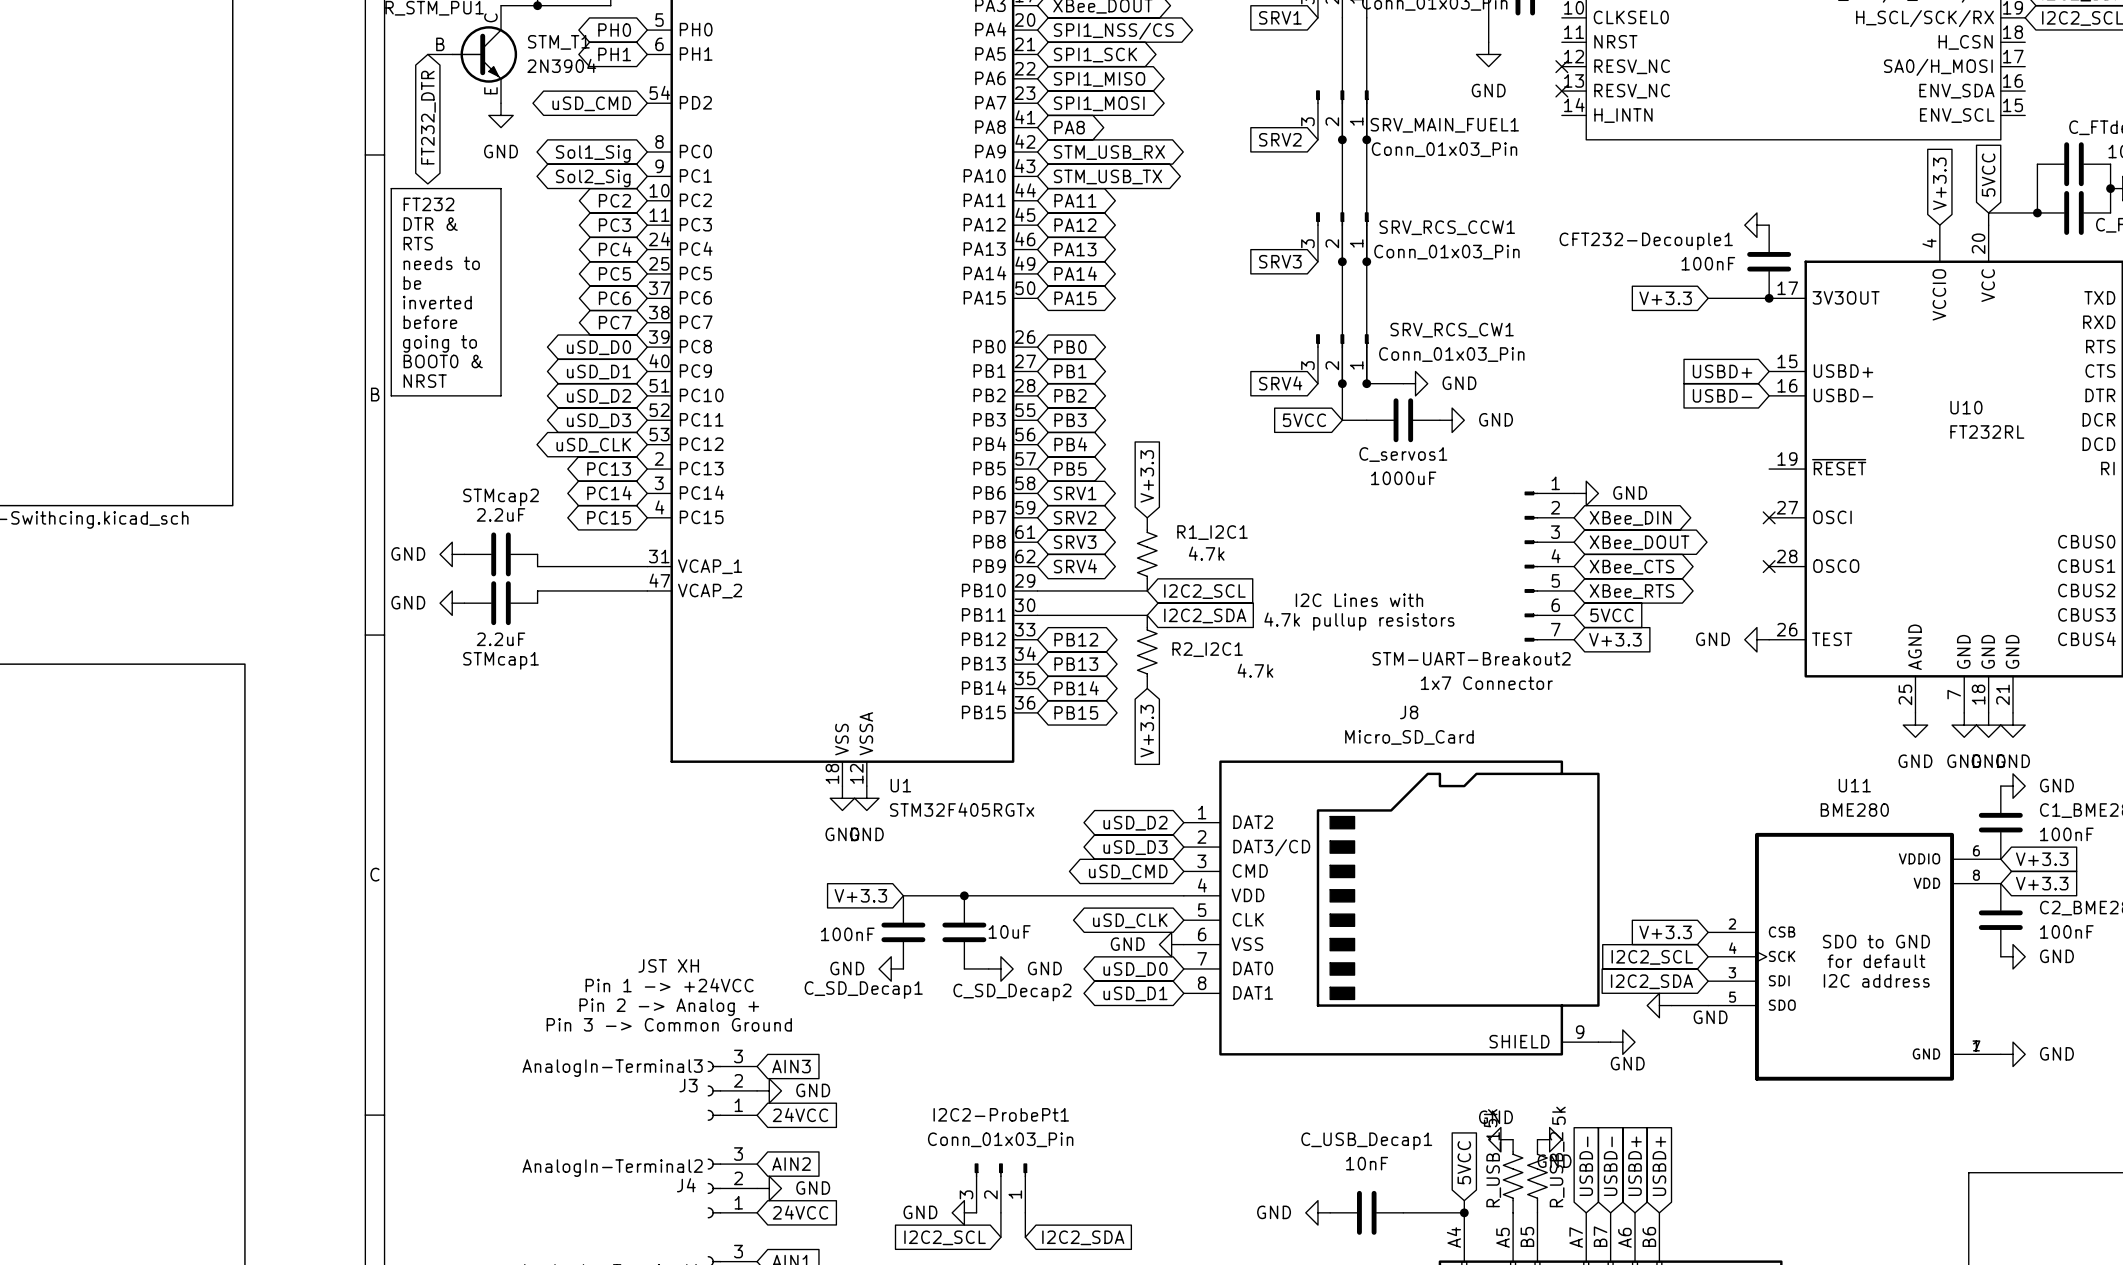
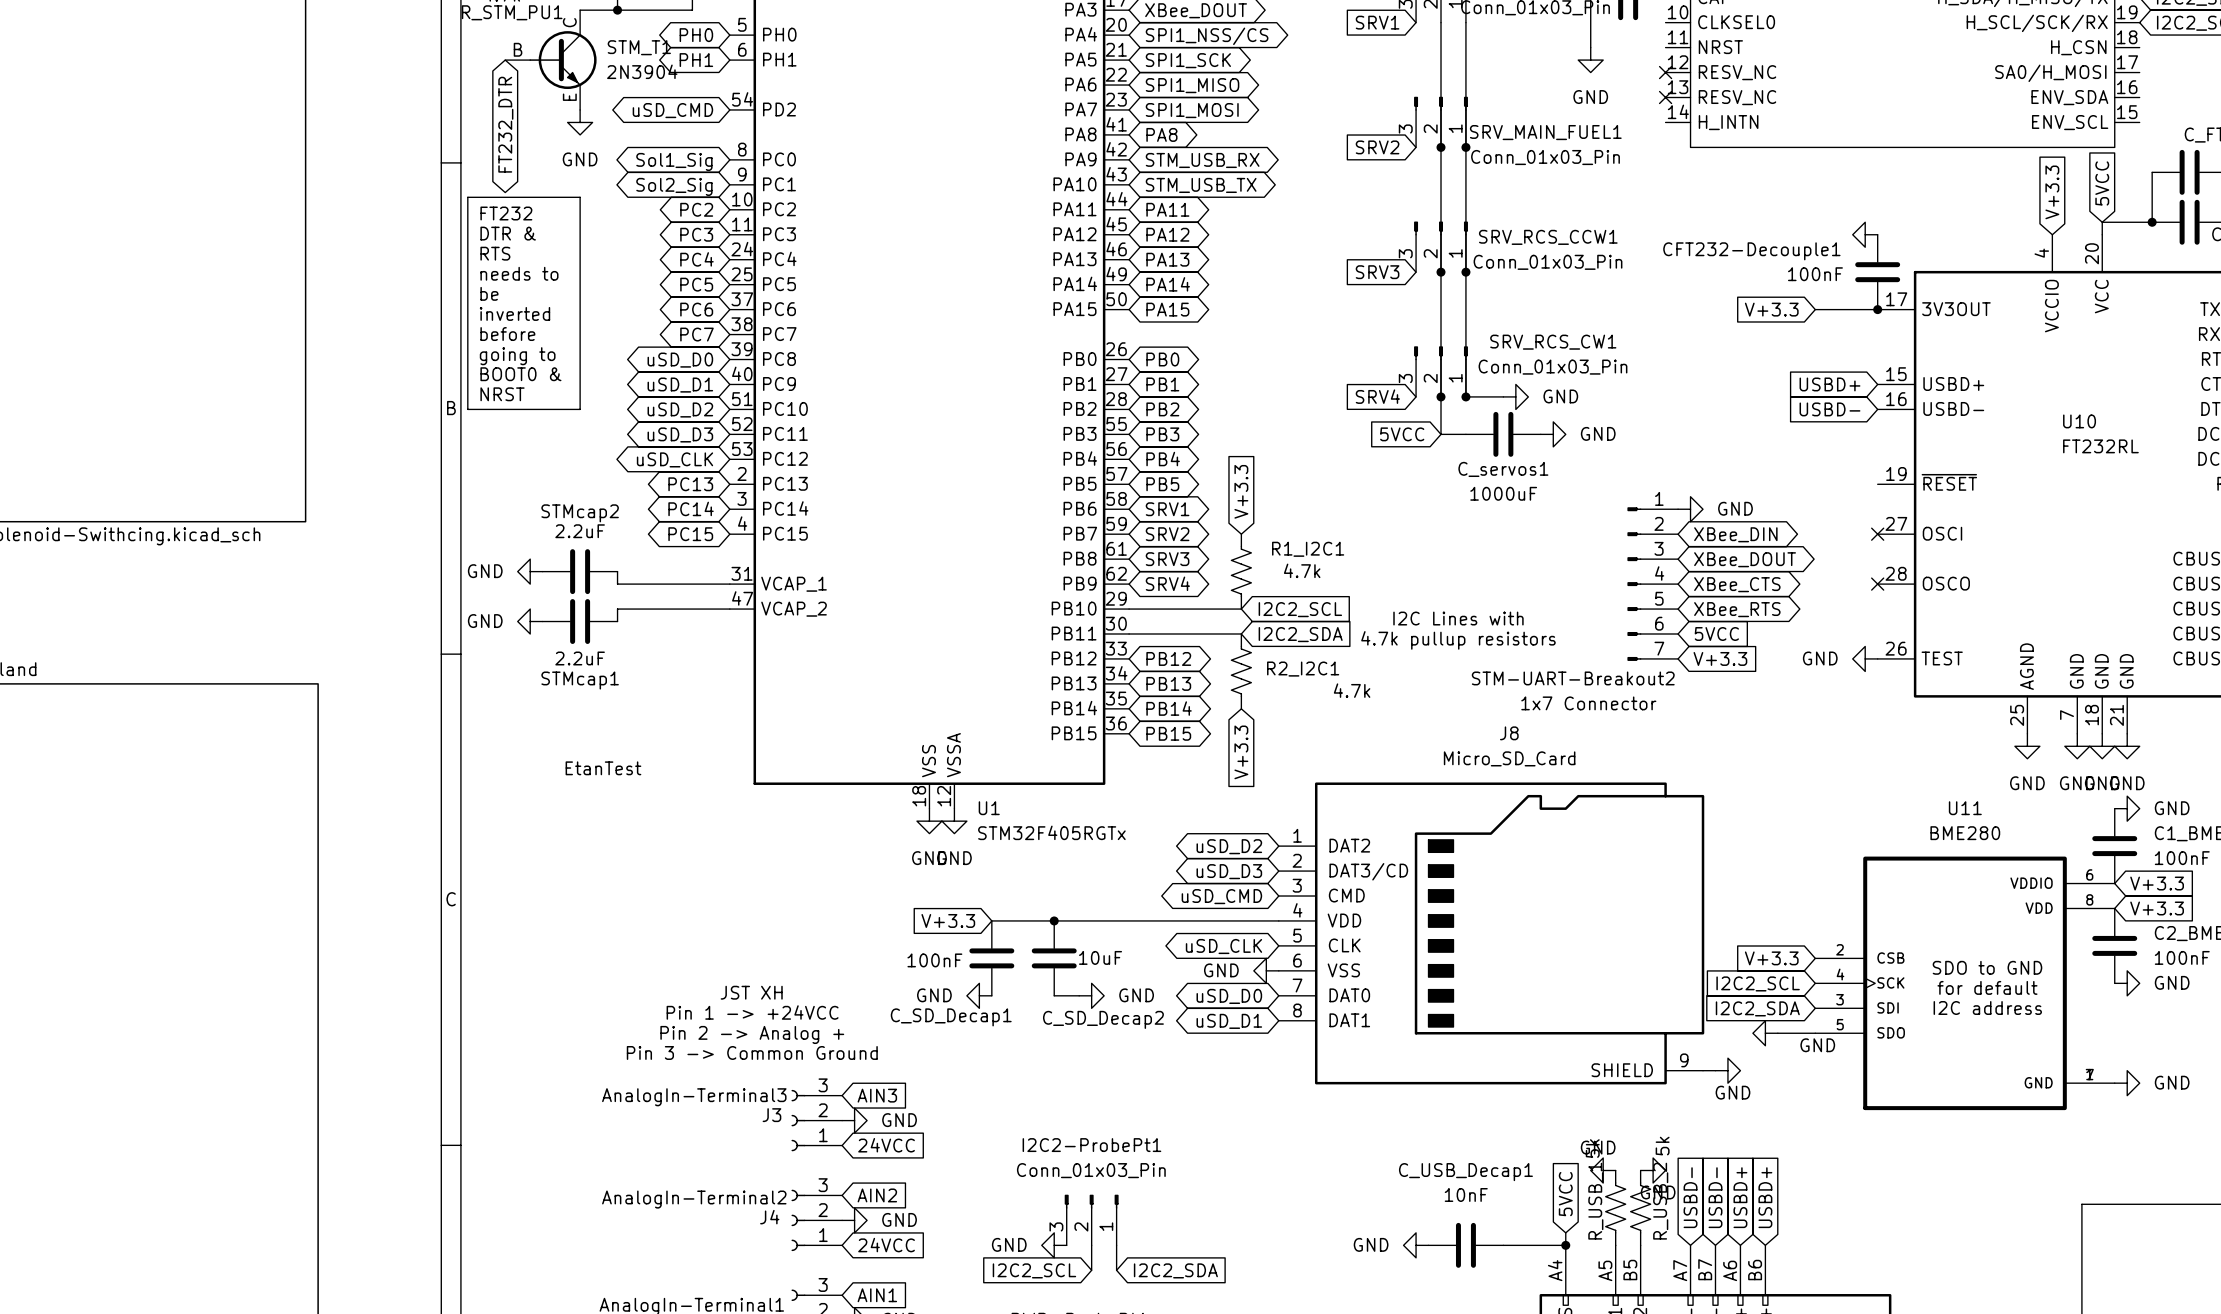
text: none -> EtanTest (603, 768)

